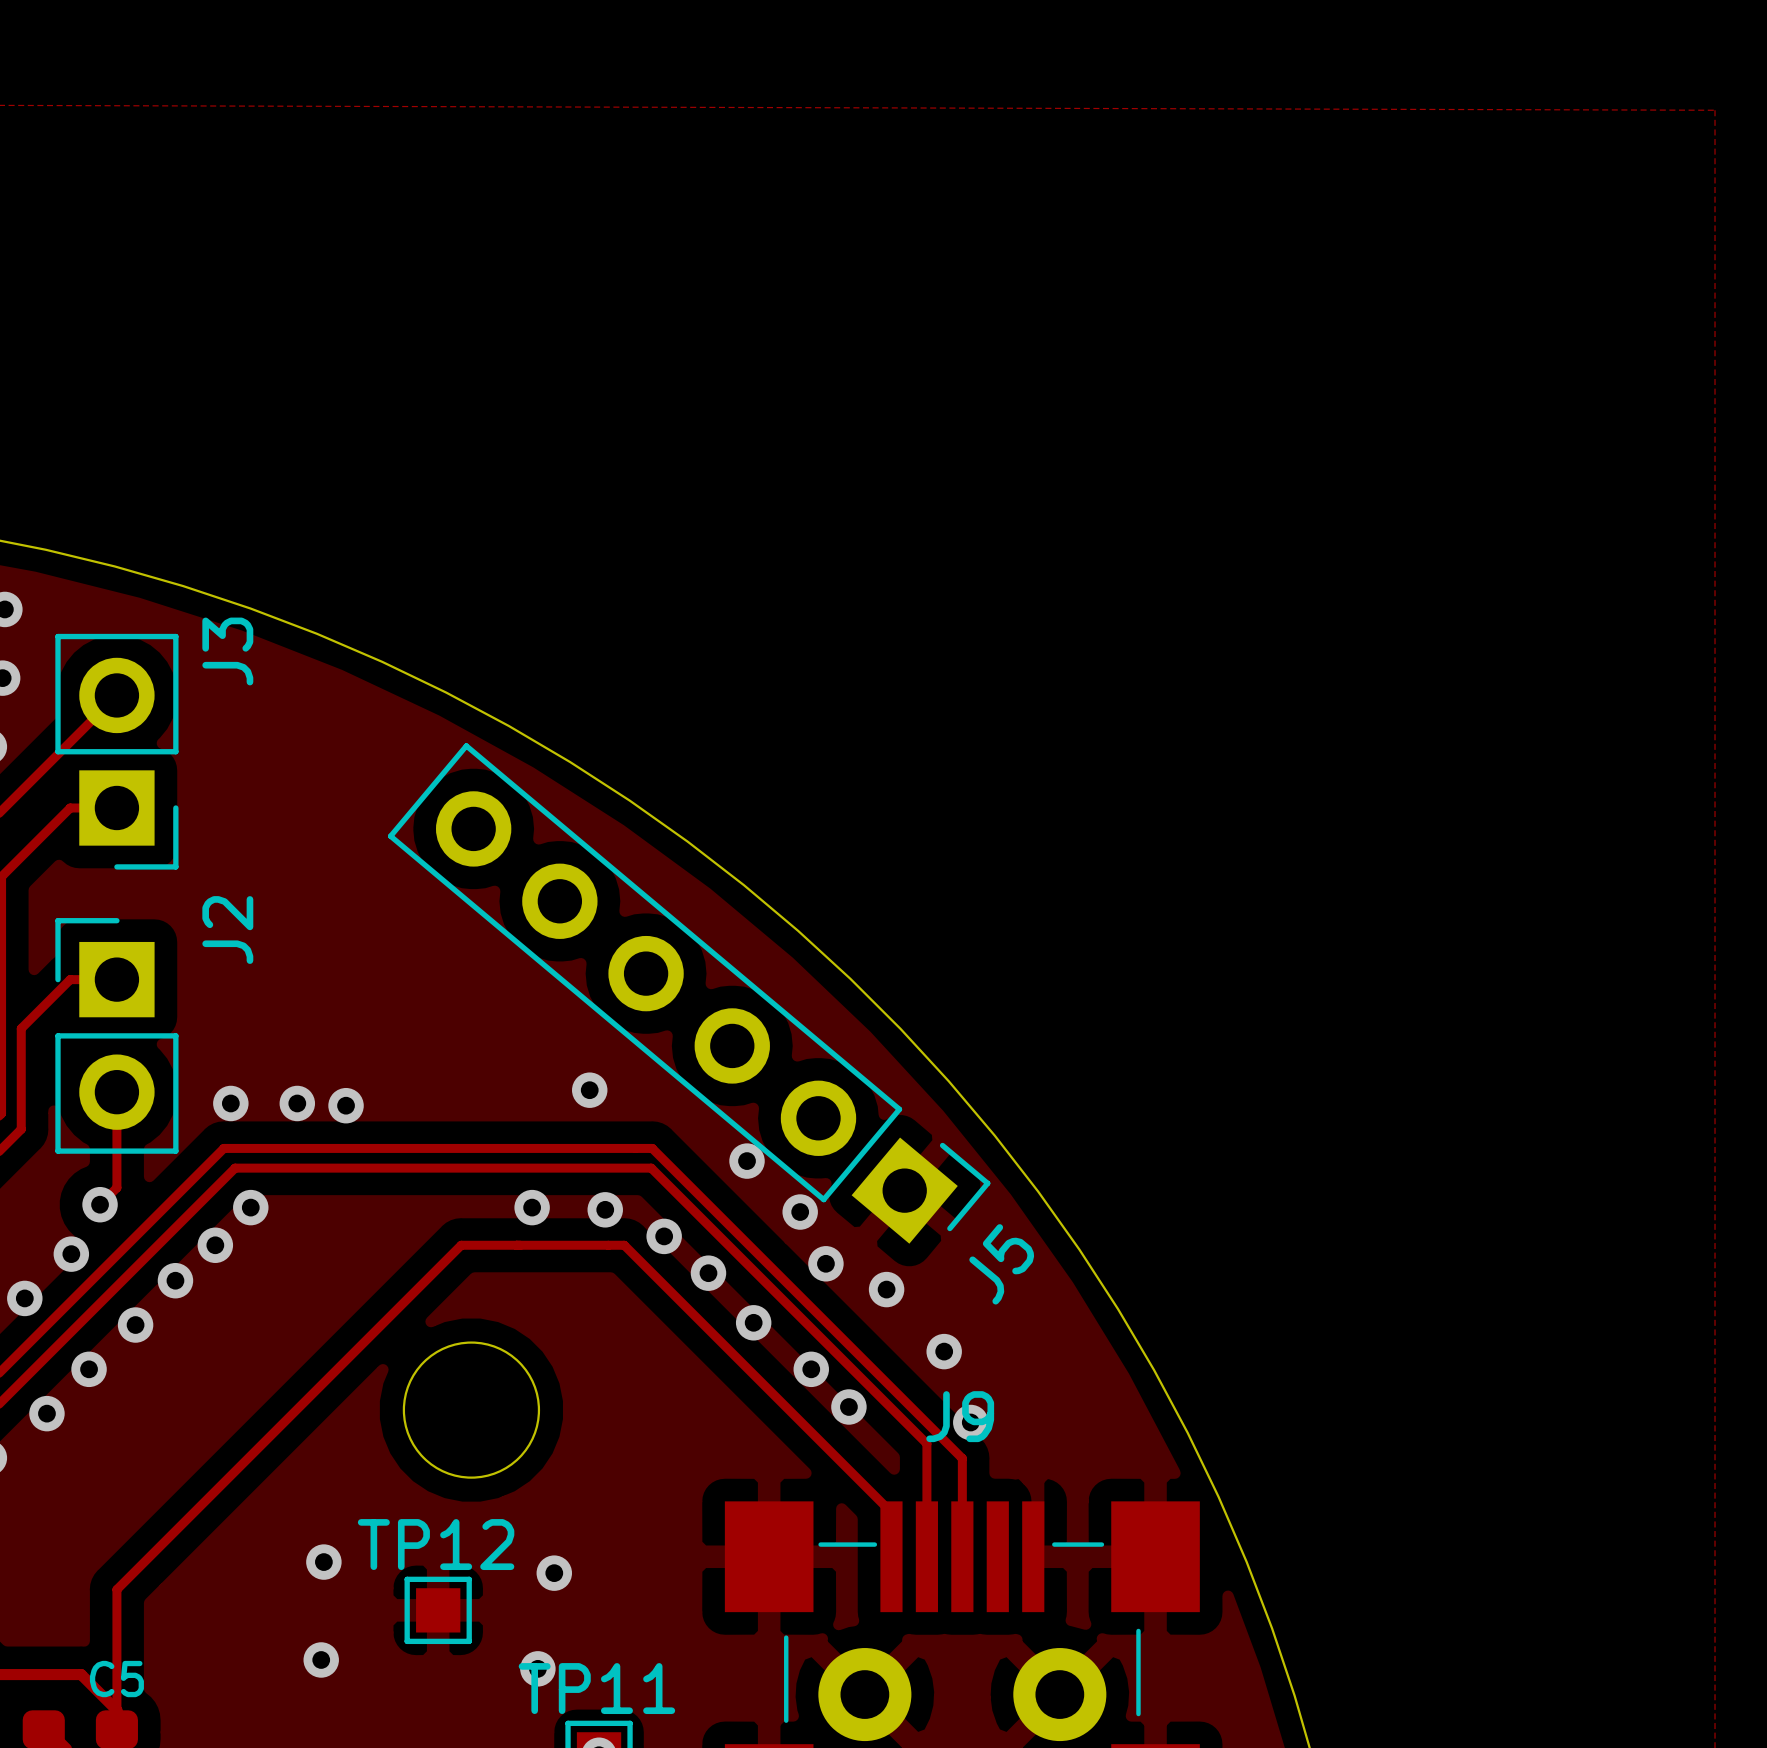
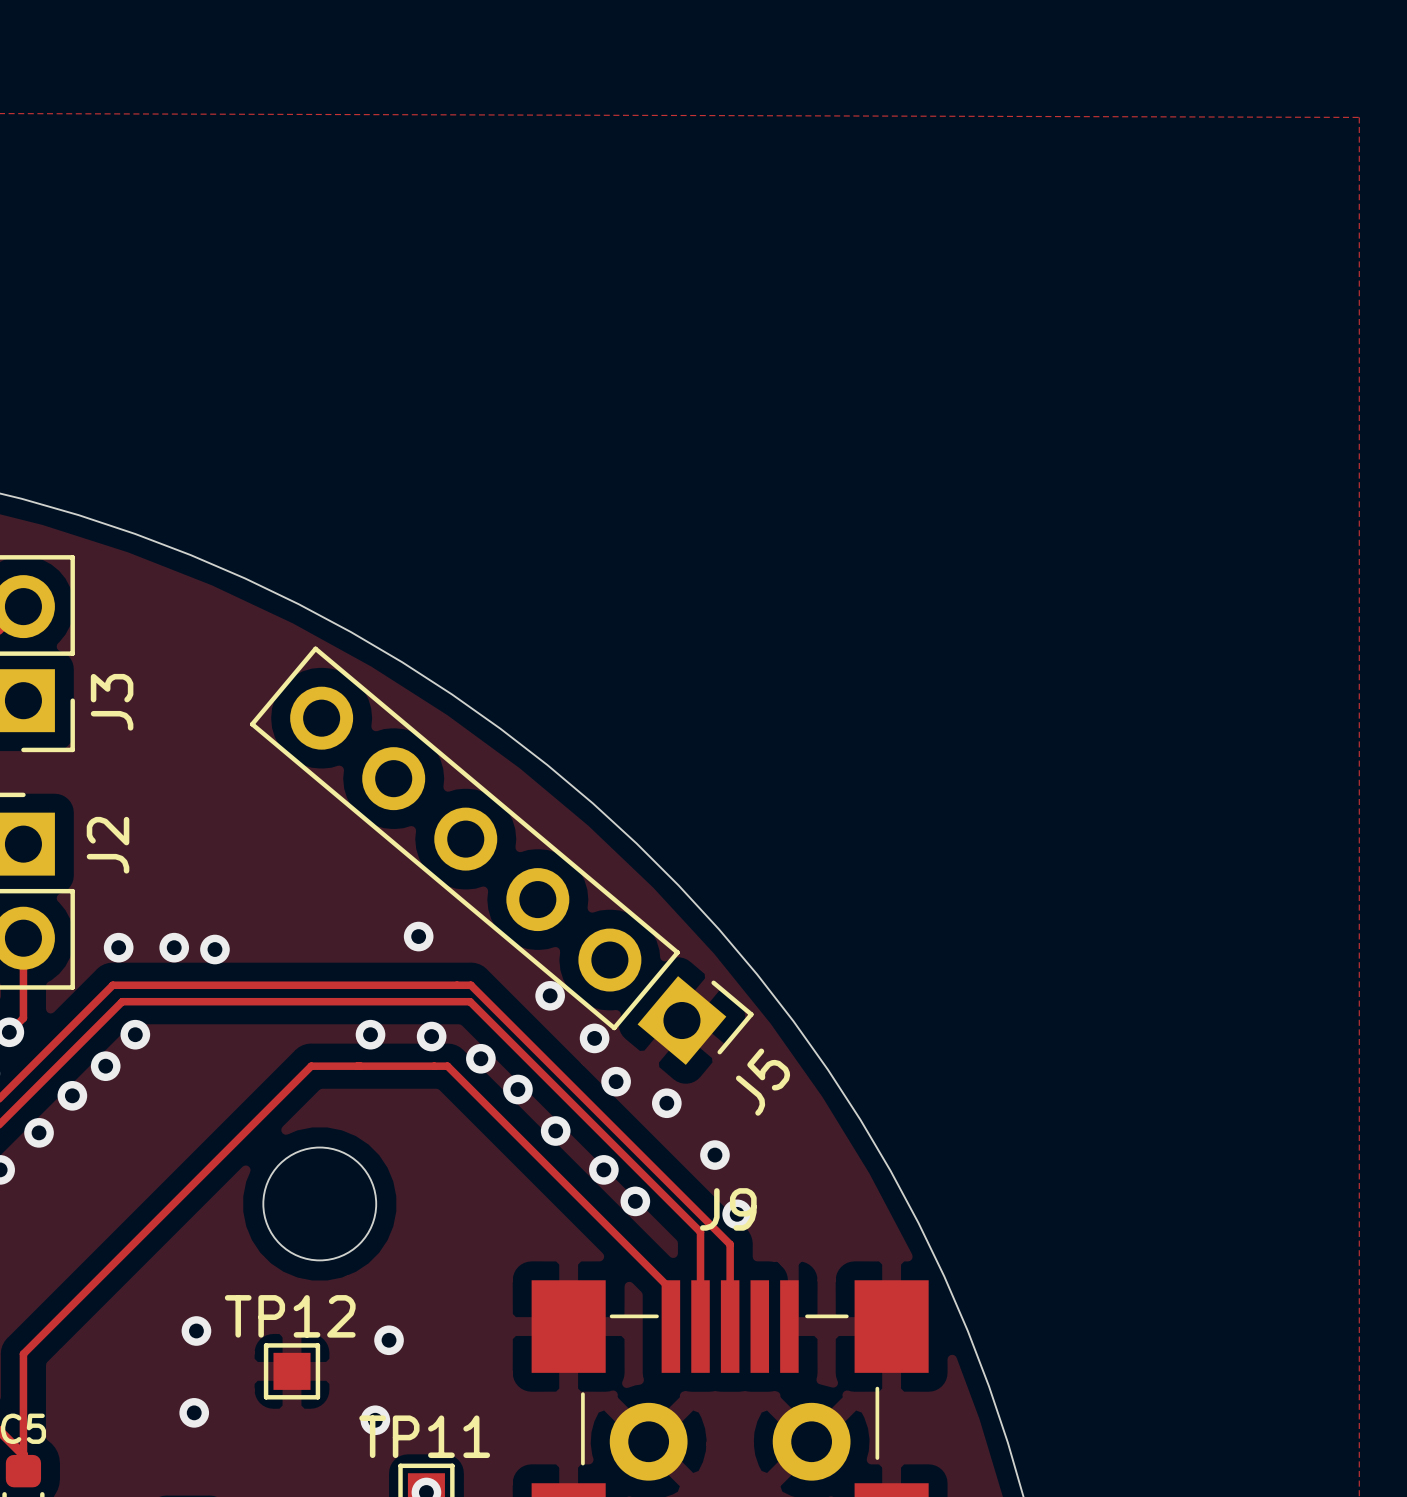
J3 name position: J3 (227, 651) -> J3 (112, 702)
J2 name position: J2 (227, 930) -> J2 (108, 845)

